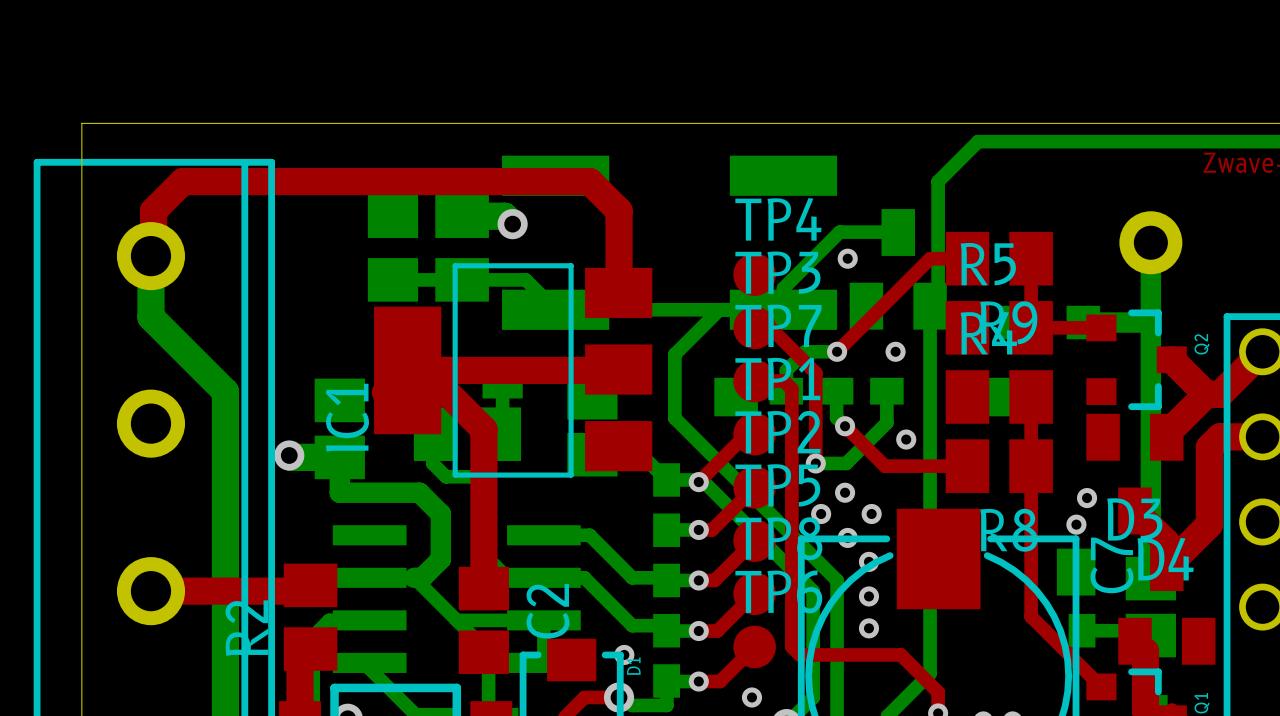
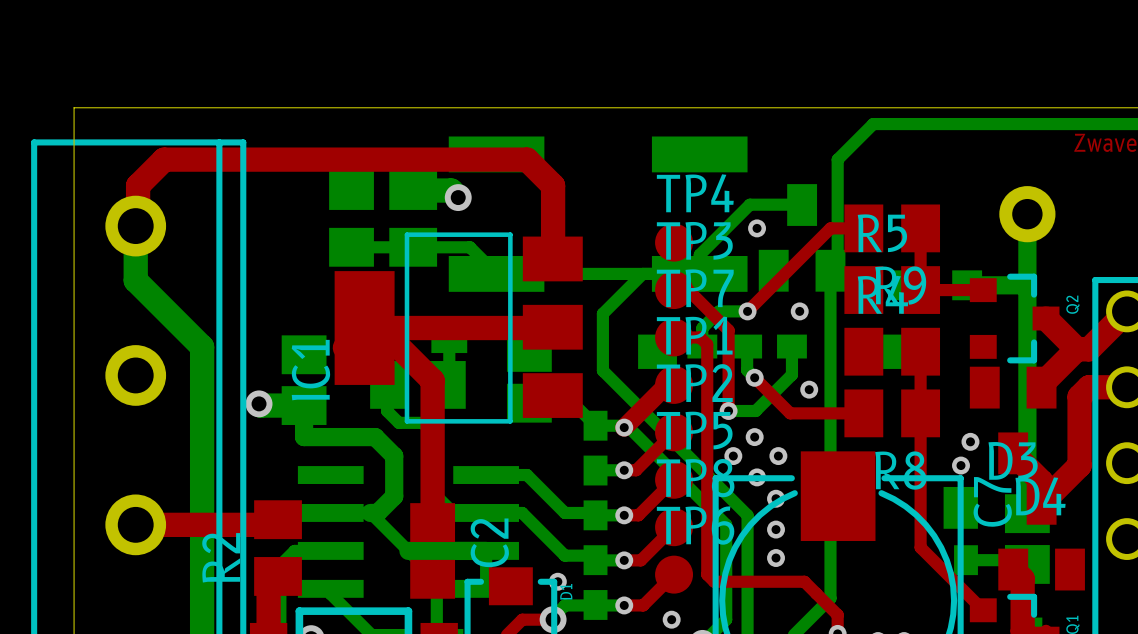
top track width: thin (754, 434) (746, 434) (698, 482) -> thick (674, 384) (666, 384) (624, 427)
bottom track width: thin (456, 620) (543, 620) -> thick (408, 550) (486, 550)
bottom track: (666, 681) (666, 705) (632, 705) (619, 697) -> (596, 605) (564, 605) (553, 617)

